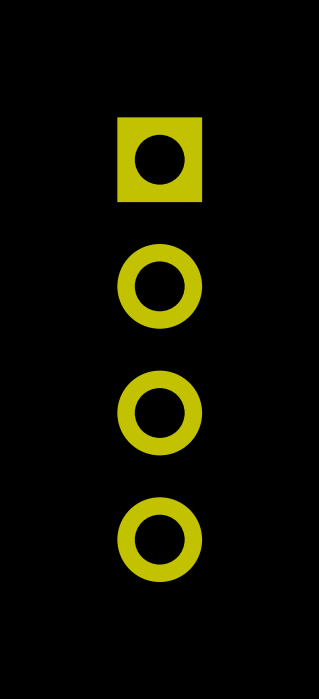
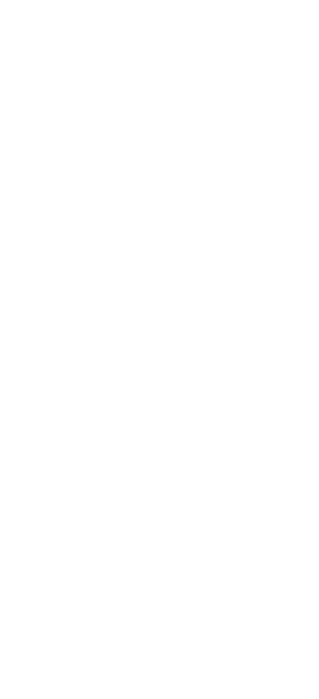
part: (159, 349) -> none

